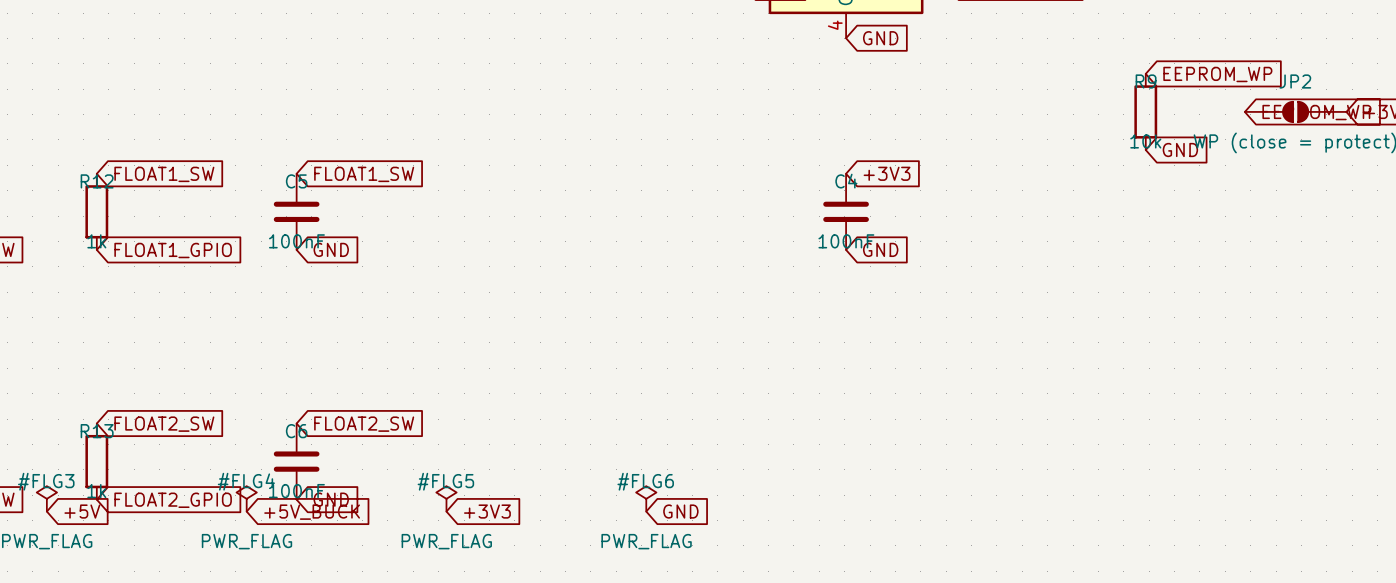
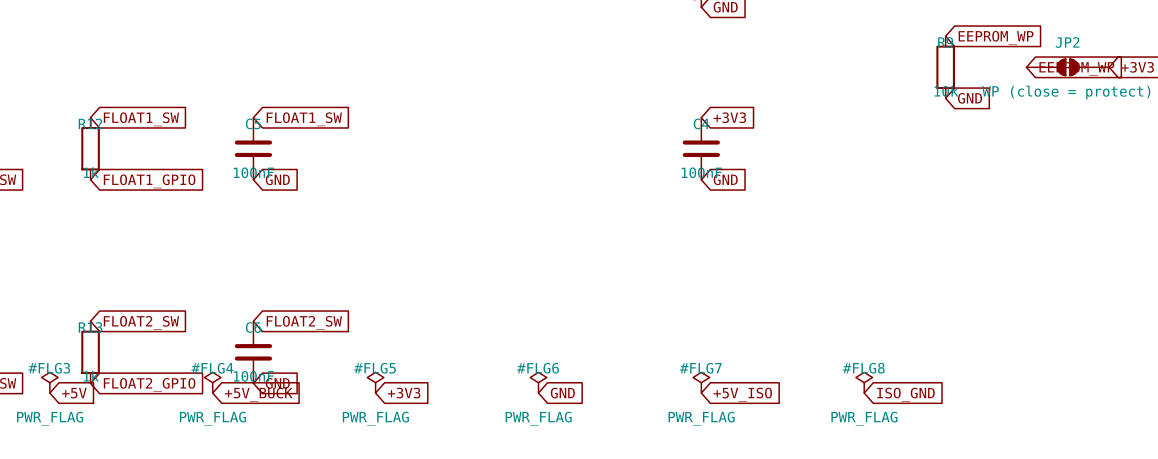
#FLG7: none -> PWR_FLAG (701, 382)
#FLG8: none -> PWR_FLAG (864, 382)
global label: none -> +5V_ISO (742, 394)
global label: none -> ISO_GND (906, 394)

